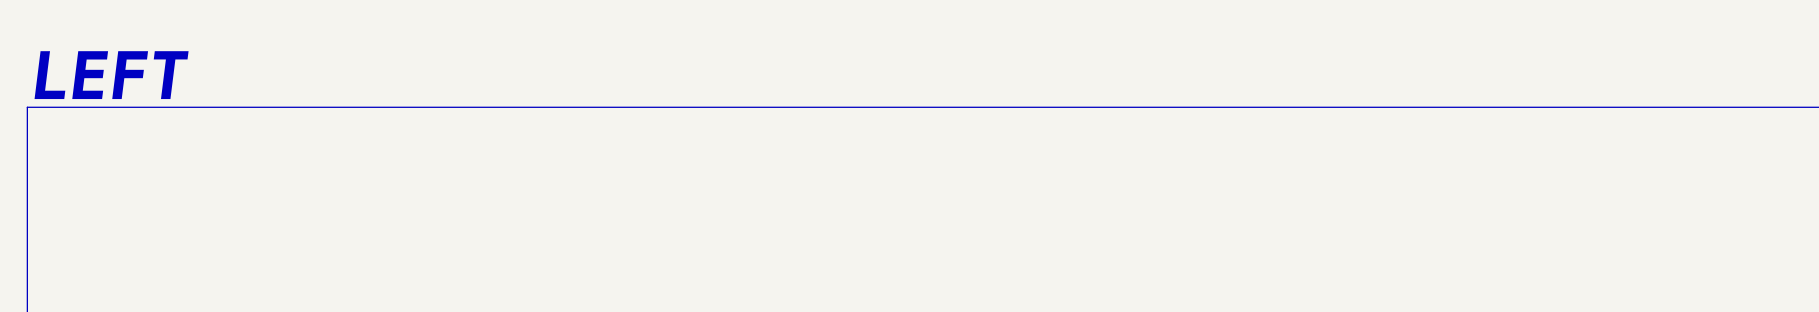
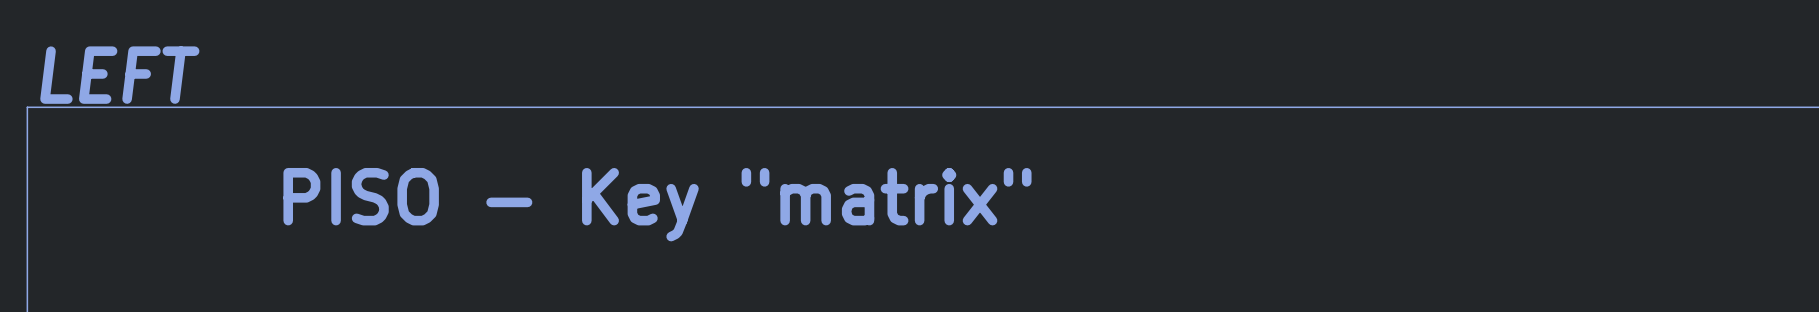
text: none -> PISO - Key "matrix" (657, 204)

